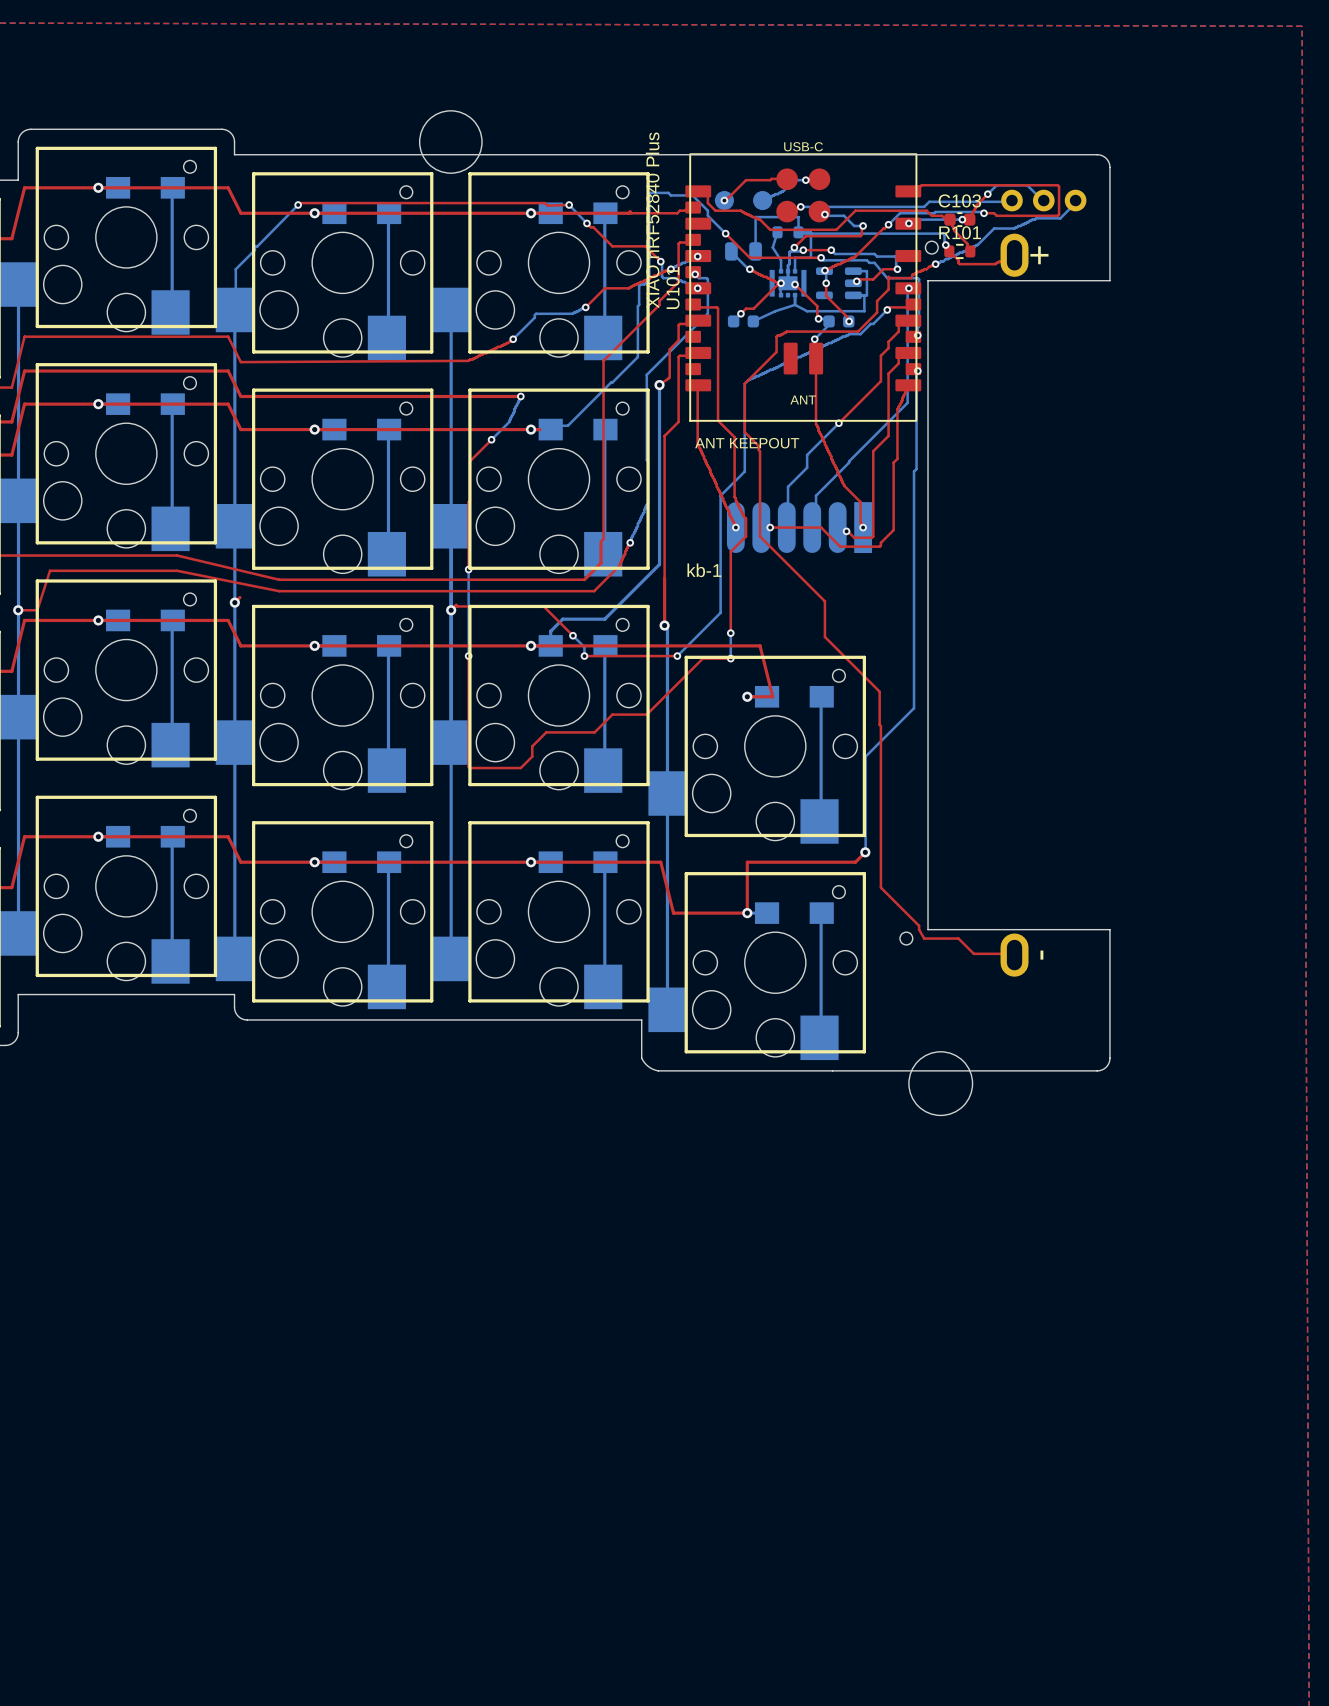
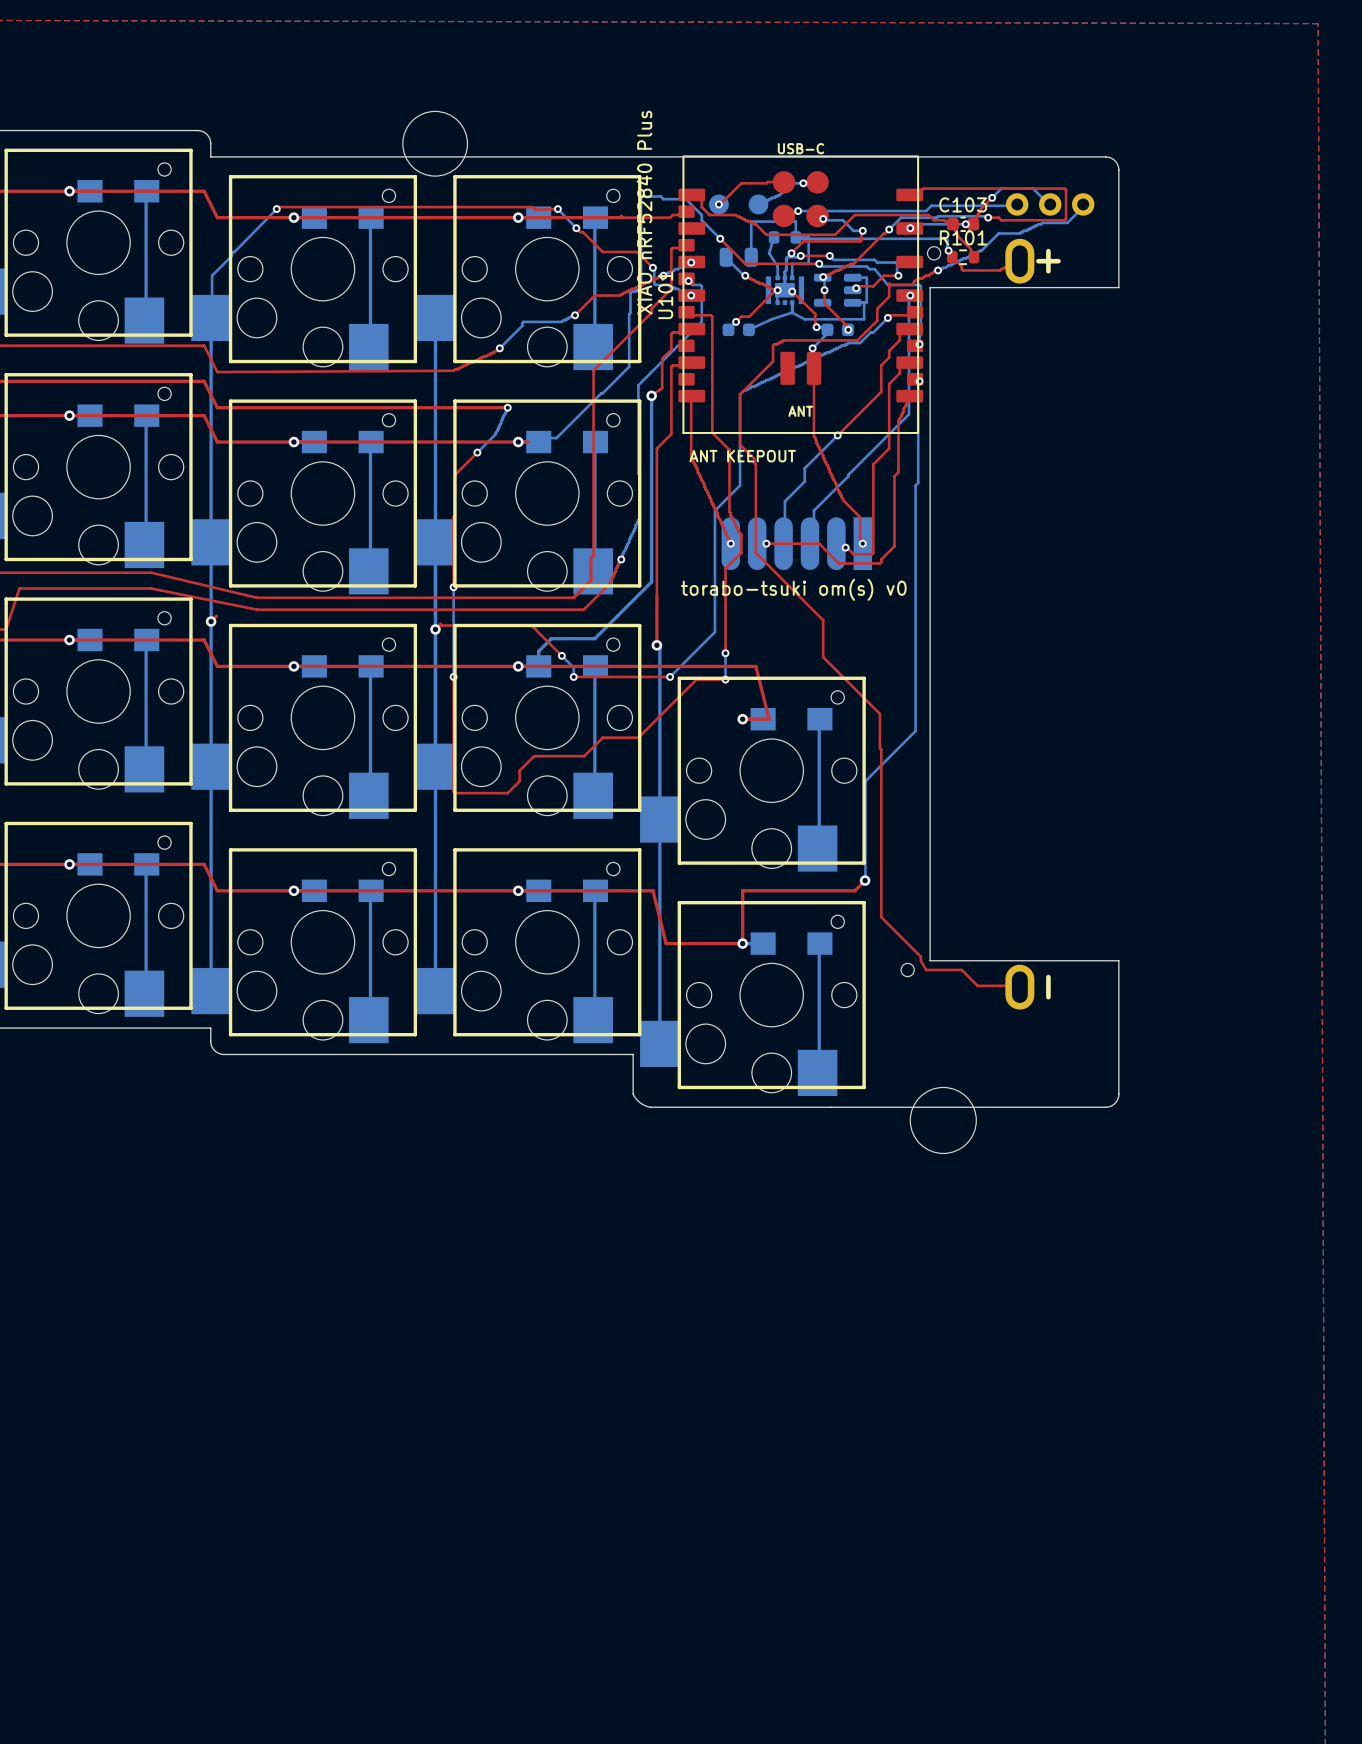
text: kb-1 (704, 570) -> torabo-tsuki om(s) v0 (793, 589)

